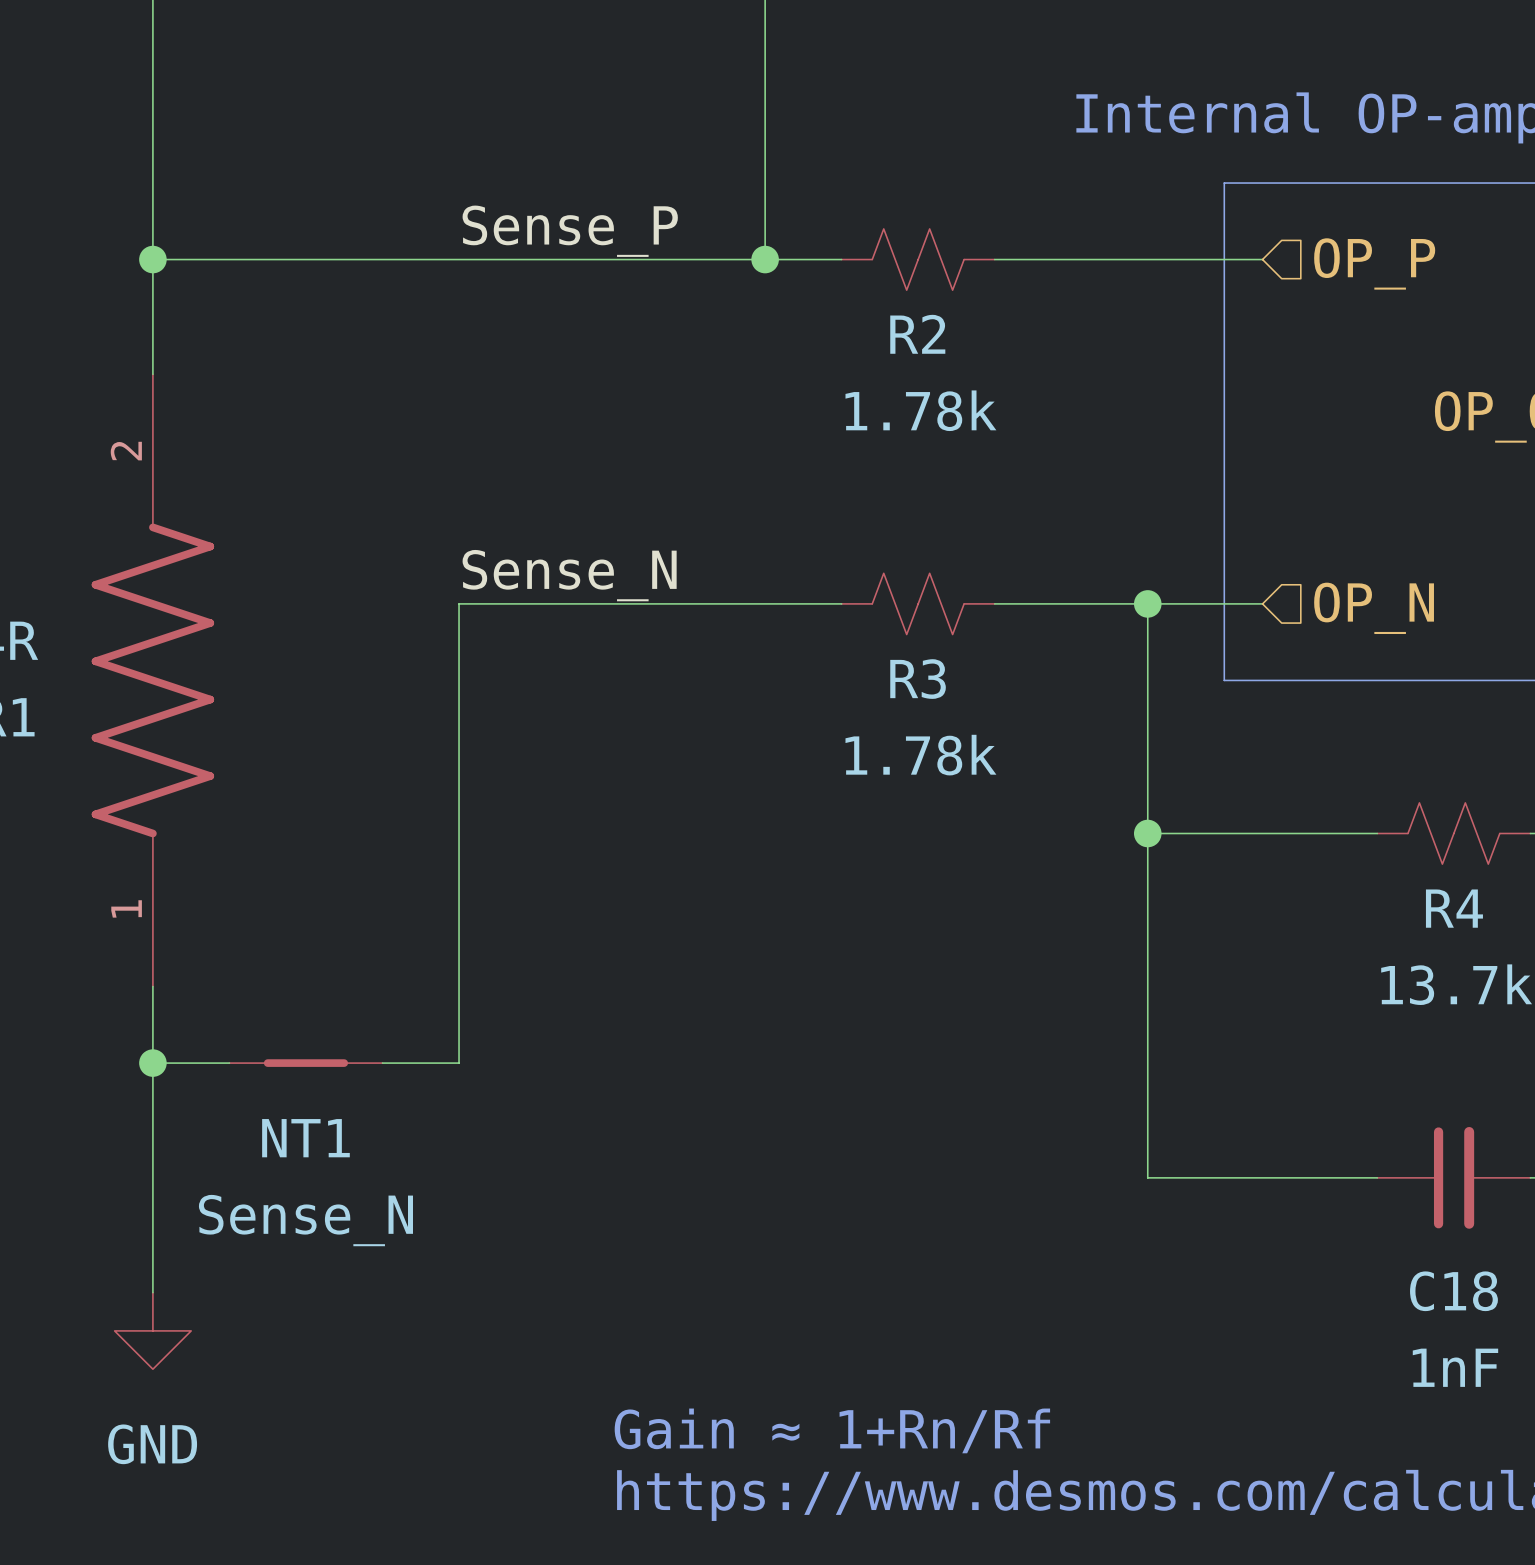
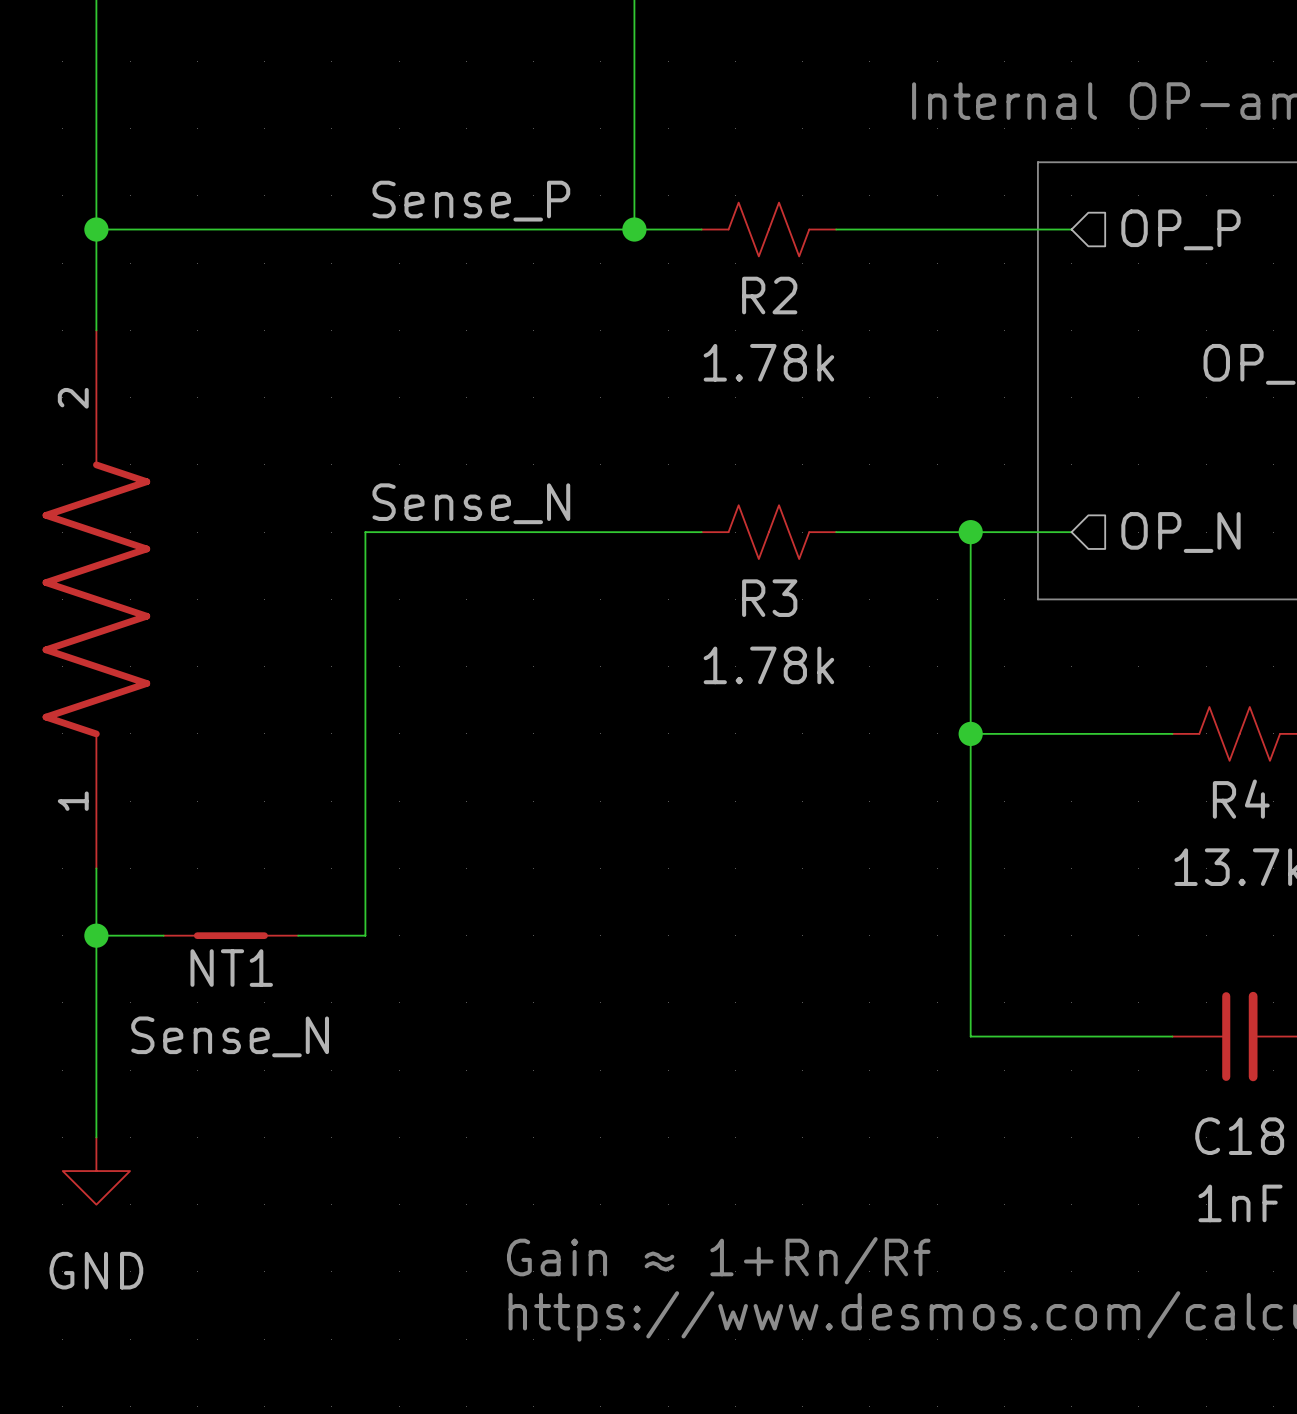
NT1 name position: NT1 (305, 1138) -> NT1 (231, 968)
NT1 value position: Sense_N (305, 1220) -> Sense_N (230, 1036)

